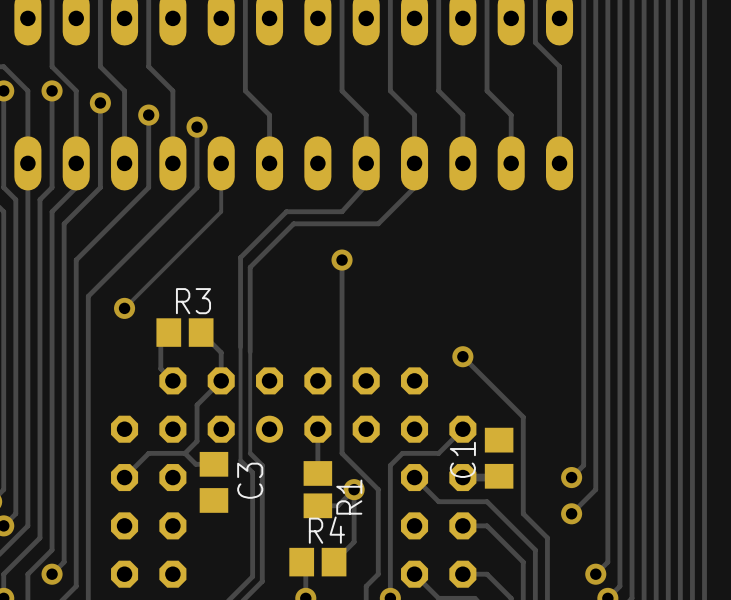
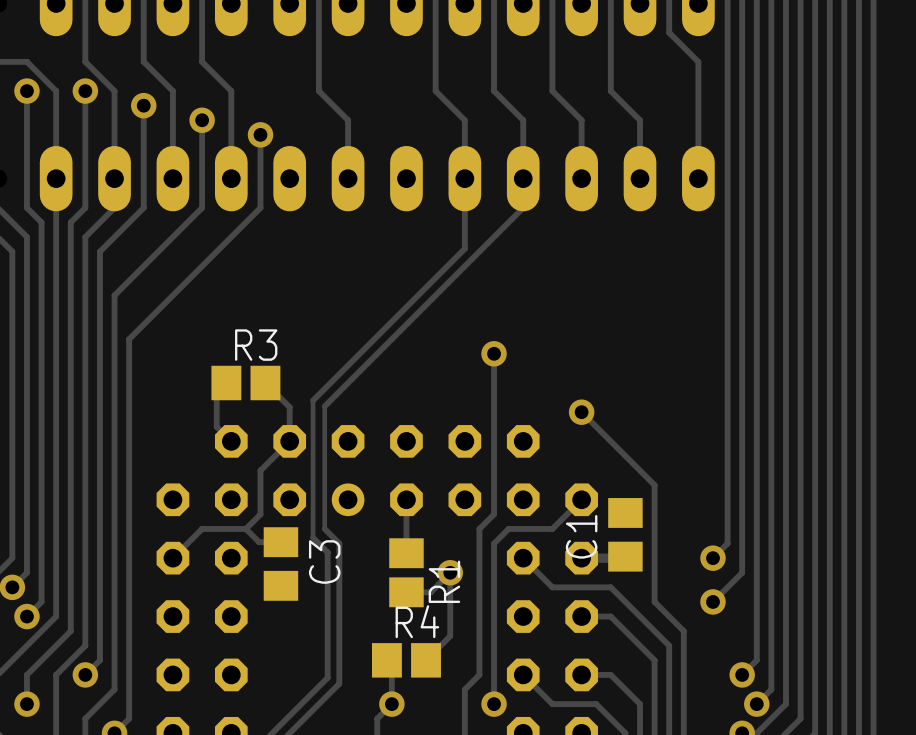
track: (221, 163) (221, 211) (124, 308) -> none
track: (366, 185) (342, 211) (286, 211) (240, 257) (240, 347) -> (464, 204) (464, 248) (313, 400)
track: (378, 223) (293, 223) (250, 267) (250, 351) -> (479, 251) (324, 406)
track: (342, 260) (342, 453) (378, 489) (378, 574) -> (494, 353) (494, 514) (479, 528) (479, 674)
via position: (342, 260) -> (494, 353)
via: (124, 308) -> none

